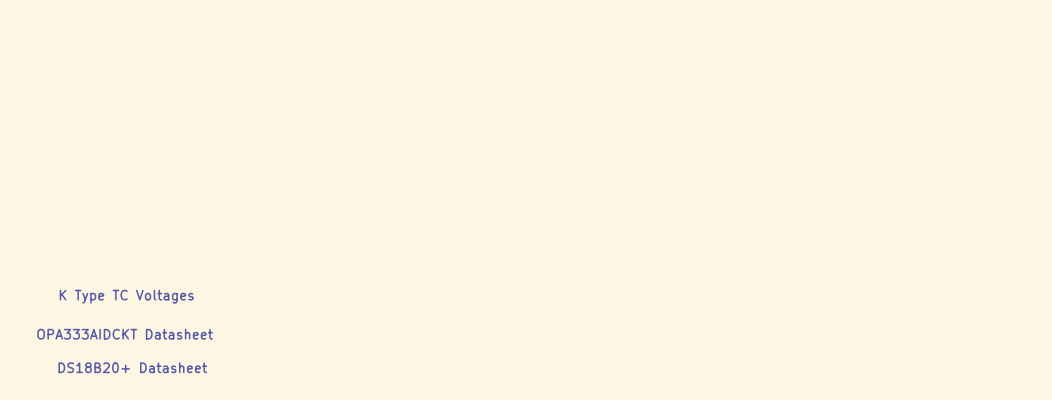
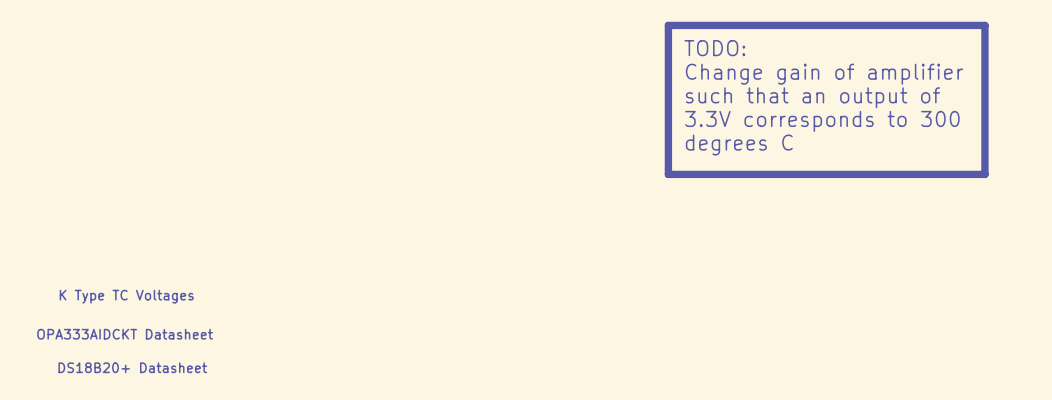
line: none -> (668, 25) (984, 25) (984, 174) (668, 174) (668, 25)
text: none -> TODO: (714, 48)
text: none -> Change gain of amplifier (824, 74)
text: none -> such that an output of (812, 97)
text: none -> 3.3V corresponds to 300 (822, 121)
text: none -> degrees C (739, 145)

